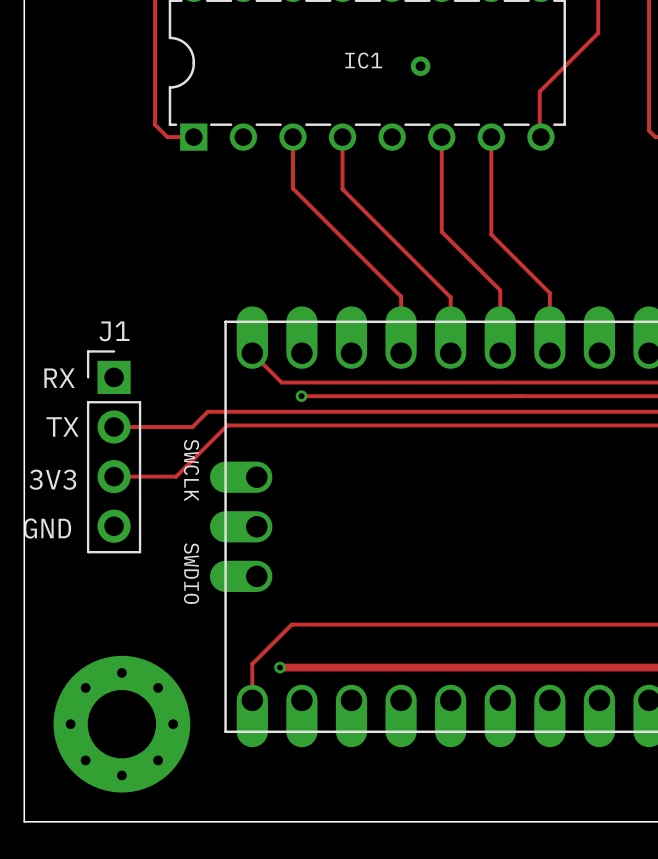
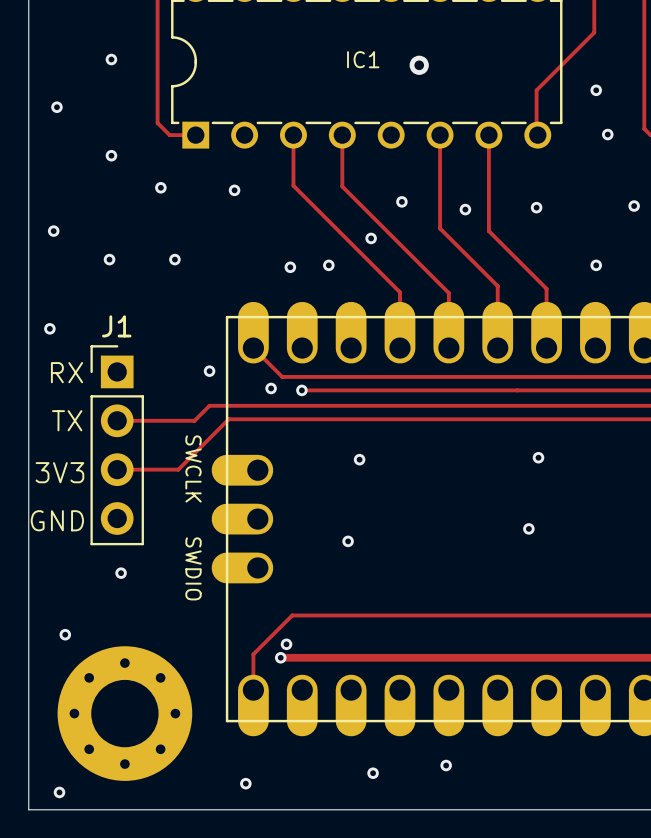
via: none -> (111, 59)
via: none -> (596, 90)
via: none -> (56, 107)
via: none -> (607, 134)
via: none -> (111, 155)
via: none -> (160, 187)
via: none -> (234, 190)
via: none -> (401, 201)
via: none -> (634, 206)
via: none -> (536, 207)
via: none -> (465, 209)
via: none -> (53, 231)
via: none -> (371, 238)
via: none -> (109, 259)
via: none -> (174, 259)
via: none -> (328, 265)
via: none -> (596, 265)
via: none -> (290, 267)
via: none -> (49, 328)
via: none -> (209, 371)
via: none -> (271, 388)
via: none -> (538, 457)
via: none -> (359, 459)
via: none -> (528, 528)
via: none -> (348, 541)
via: none -> (121, 573)
via: none -> (65, 634)
via: none -> (286, 644)
via: none -> (446, 765)
via: none -> (373, 773)
via: none -> (245, 783)
via: none -> (59, 792)

